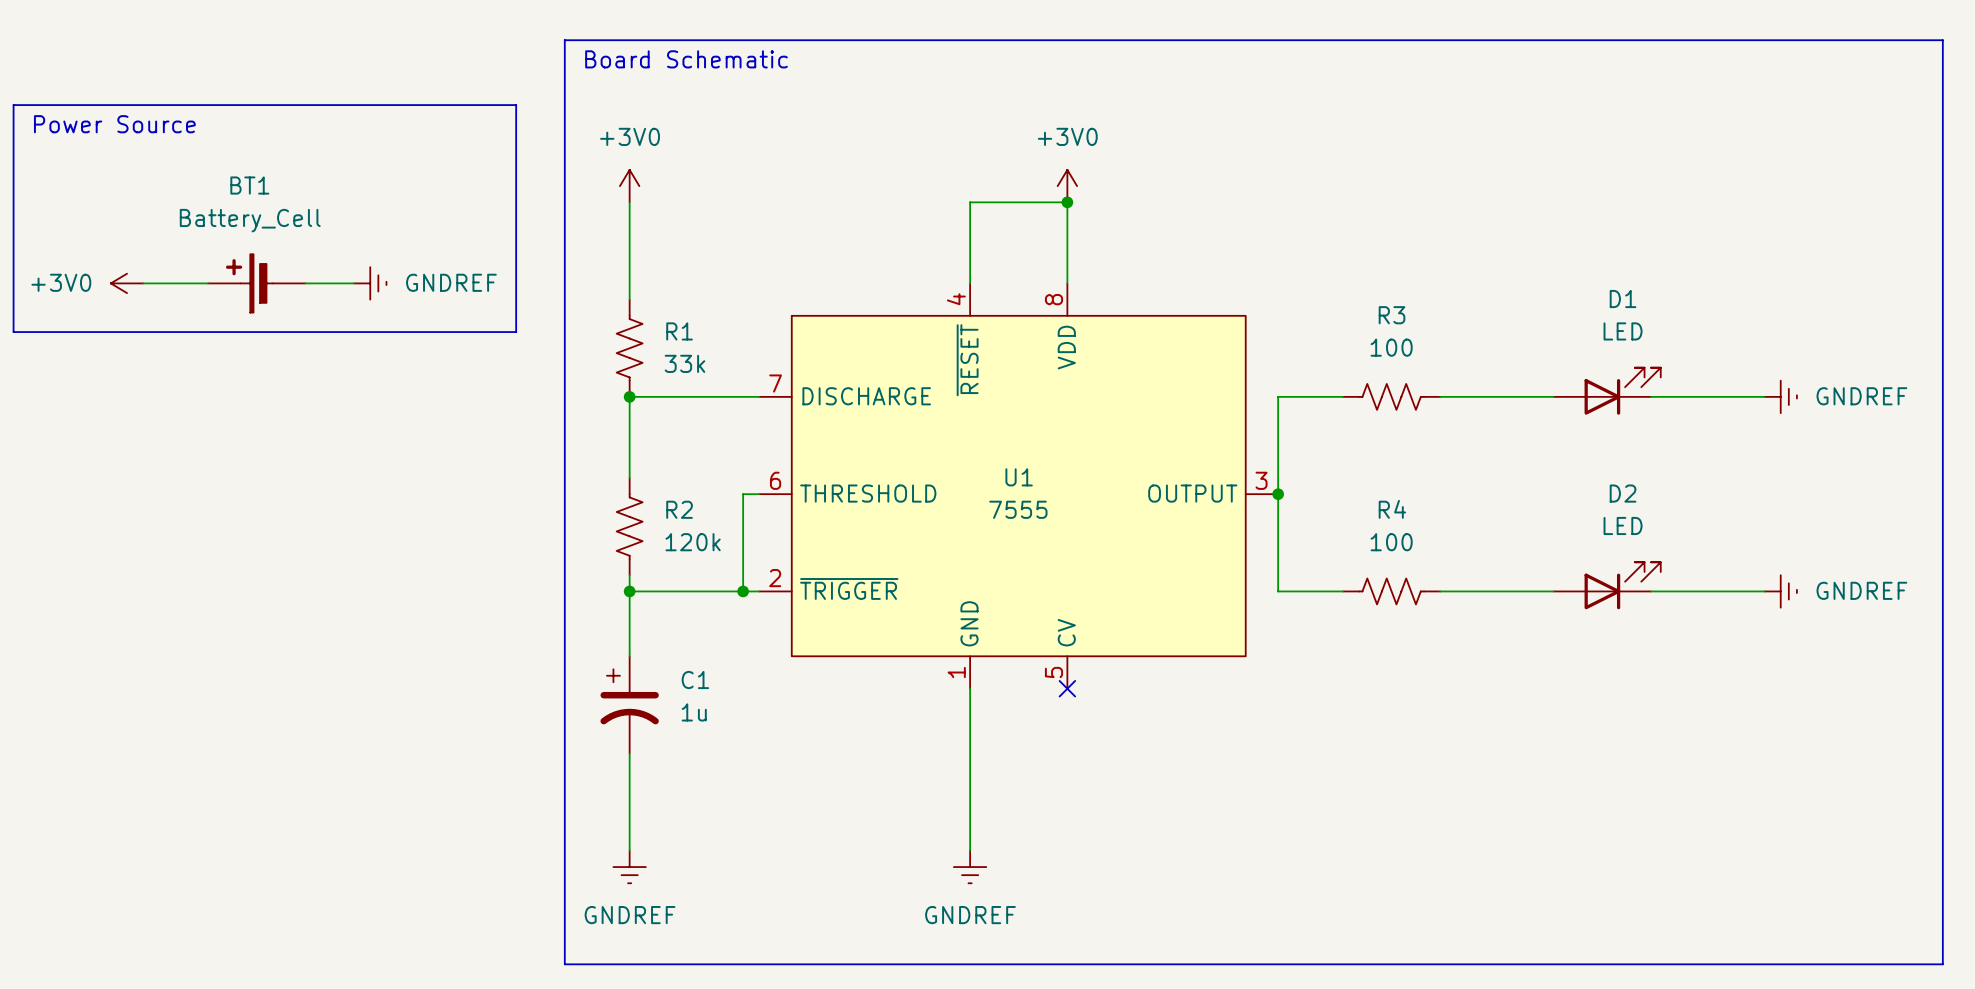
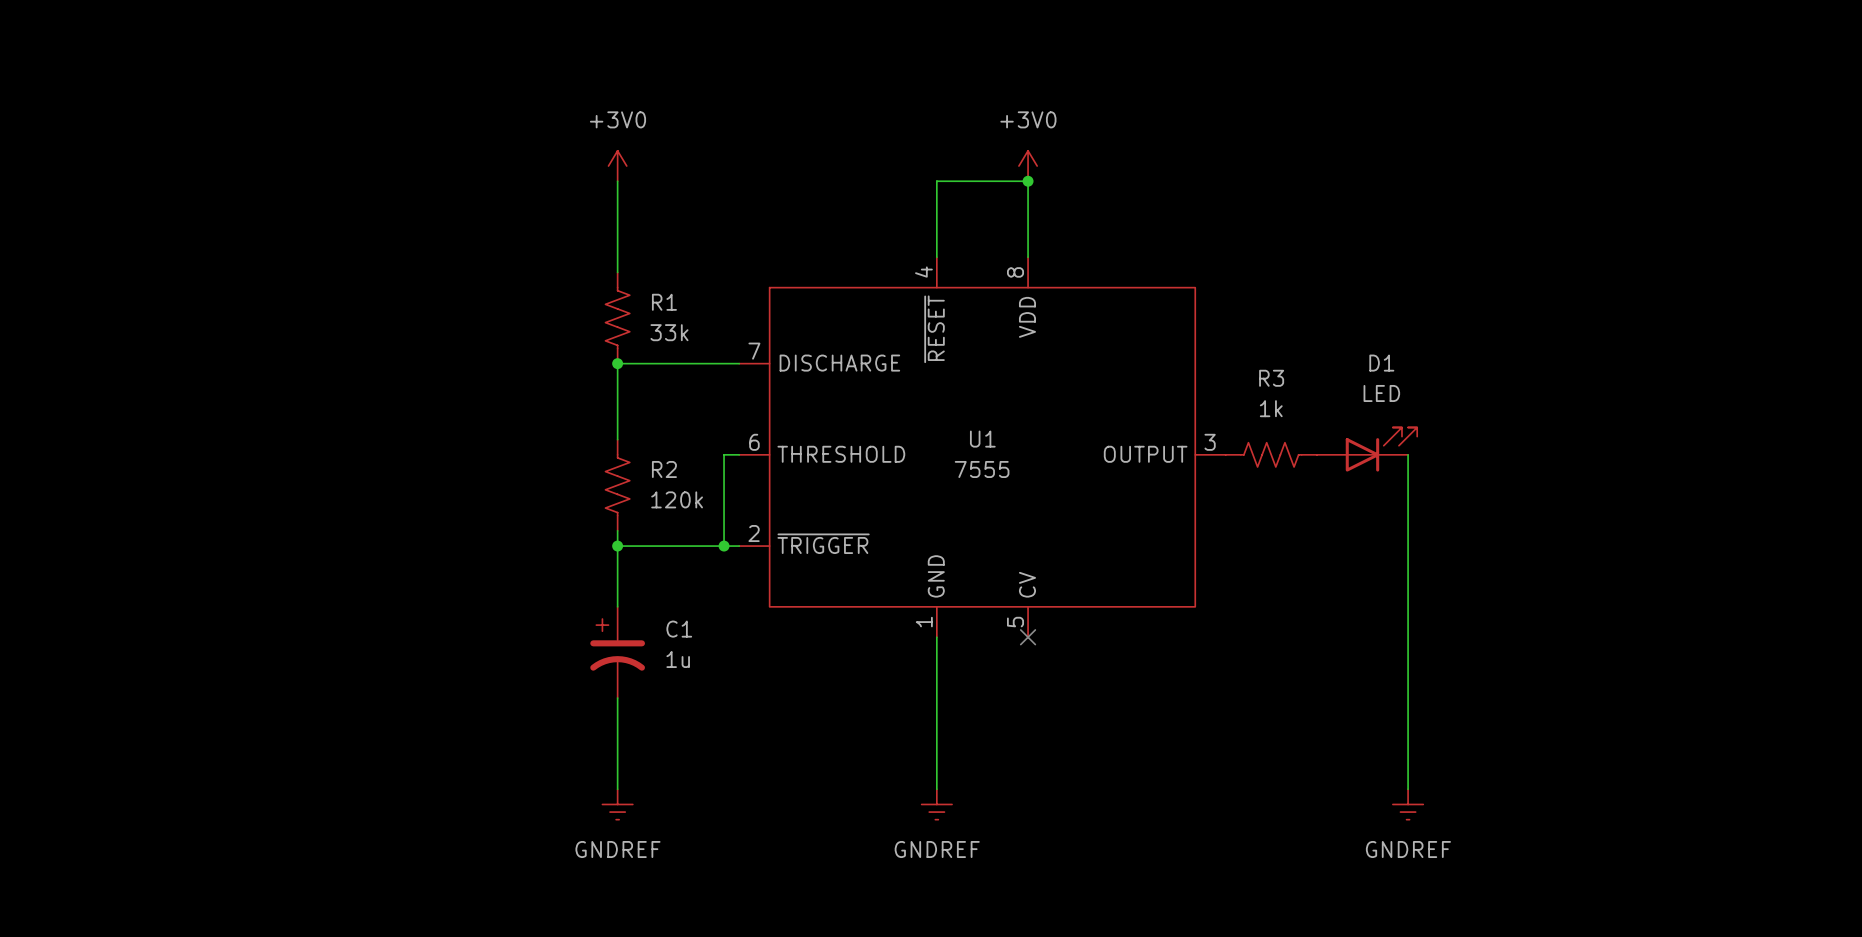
line: (564, 40) (1942, 40) (1942, 964) (564, 964) (564, 40) -> none
text: Board Schematic (686, 59) -> none
line: (13, 105) (516, 105) (516, 332) (13, 332) (13, 105) -> none
text: Power Source (114, 124) -> none
power symbol: +3V0 (127, 283) -> none
wire: (143, 283) (208, 283) -> none
BT1: Battery_Cell (256, 283) -> none
wire: (305, 283) (354, 283) -> none
power symbol: GNDREF (370, 283) -> none
R3 value: 100 (1391, 347) -> 1k (1271, 408)
D1 position: (1607, 391) -> (1367, 449)
wire: (1342, 396) (1278, 396) (1278, 591) (1342, 591) -> none
R3 position: (1391, 396) -> (1271, 454)
wire: (1440, 396) (1553, 396) -> none
wire: (1651, 396) (1764, 396) -> none
power symbol: GNDREF (1780, 396) -> none
junction: (1278, 494) -> none
wire: none -> (1408, 454) (1408, 789)
D2: LED (1607, 585) -> none
R4: 100 (1391, 591) -> none
wire: (1440, 591) (1553, 591) -> none
wire: (1651, 591) (1764, 591) -> none
power symbol: GNDREF (1780, 591) -> none
power symbol: none -> GNDREF (1408, 804)

